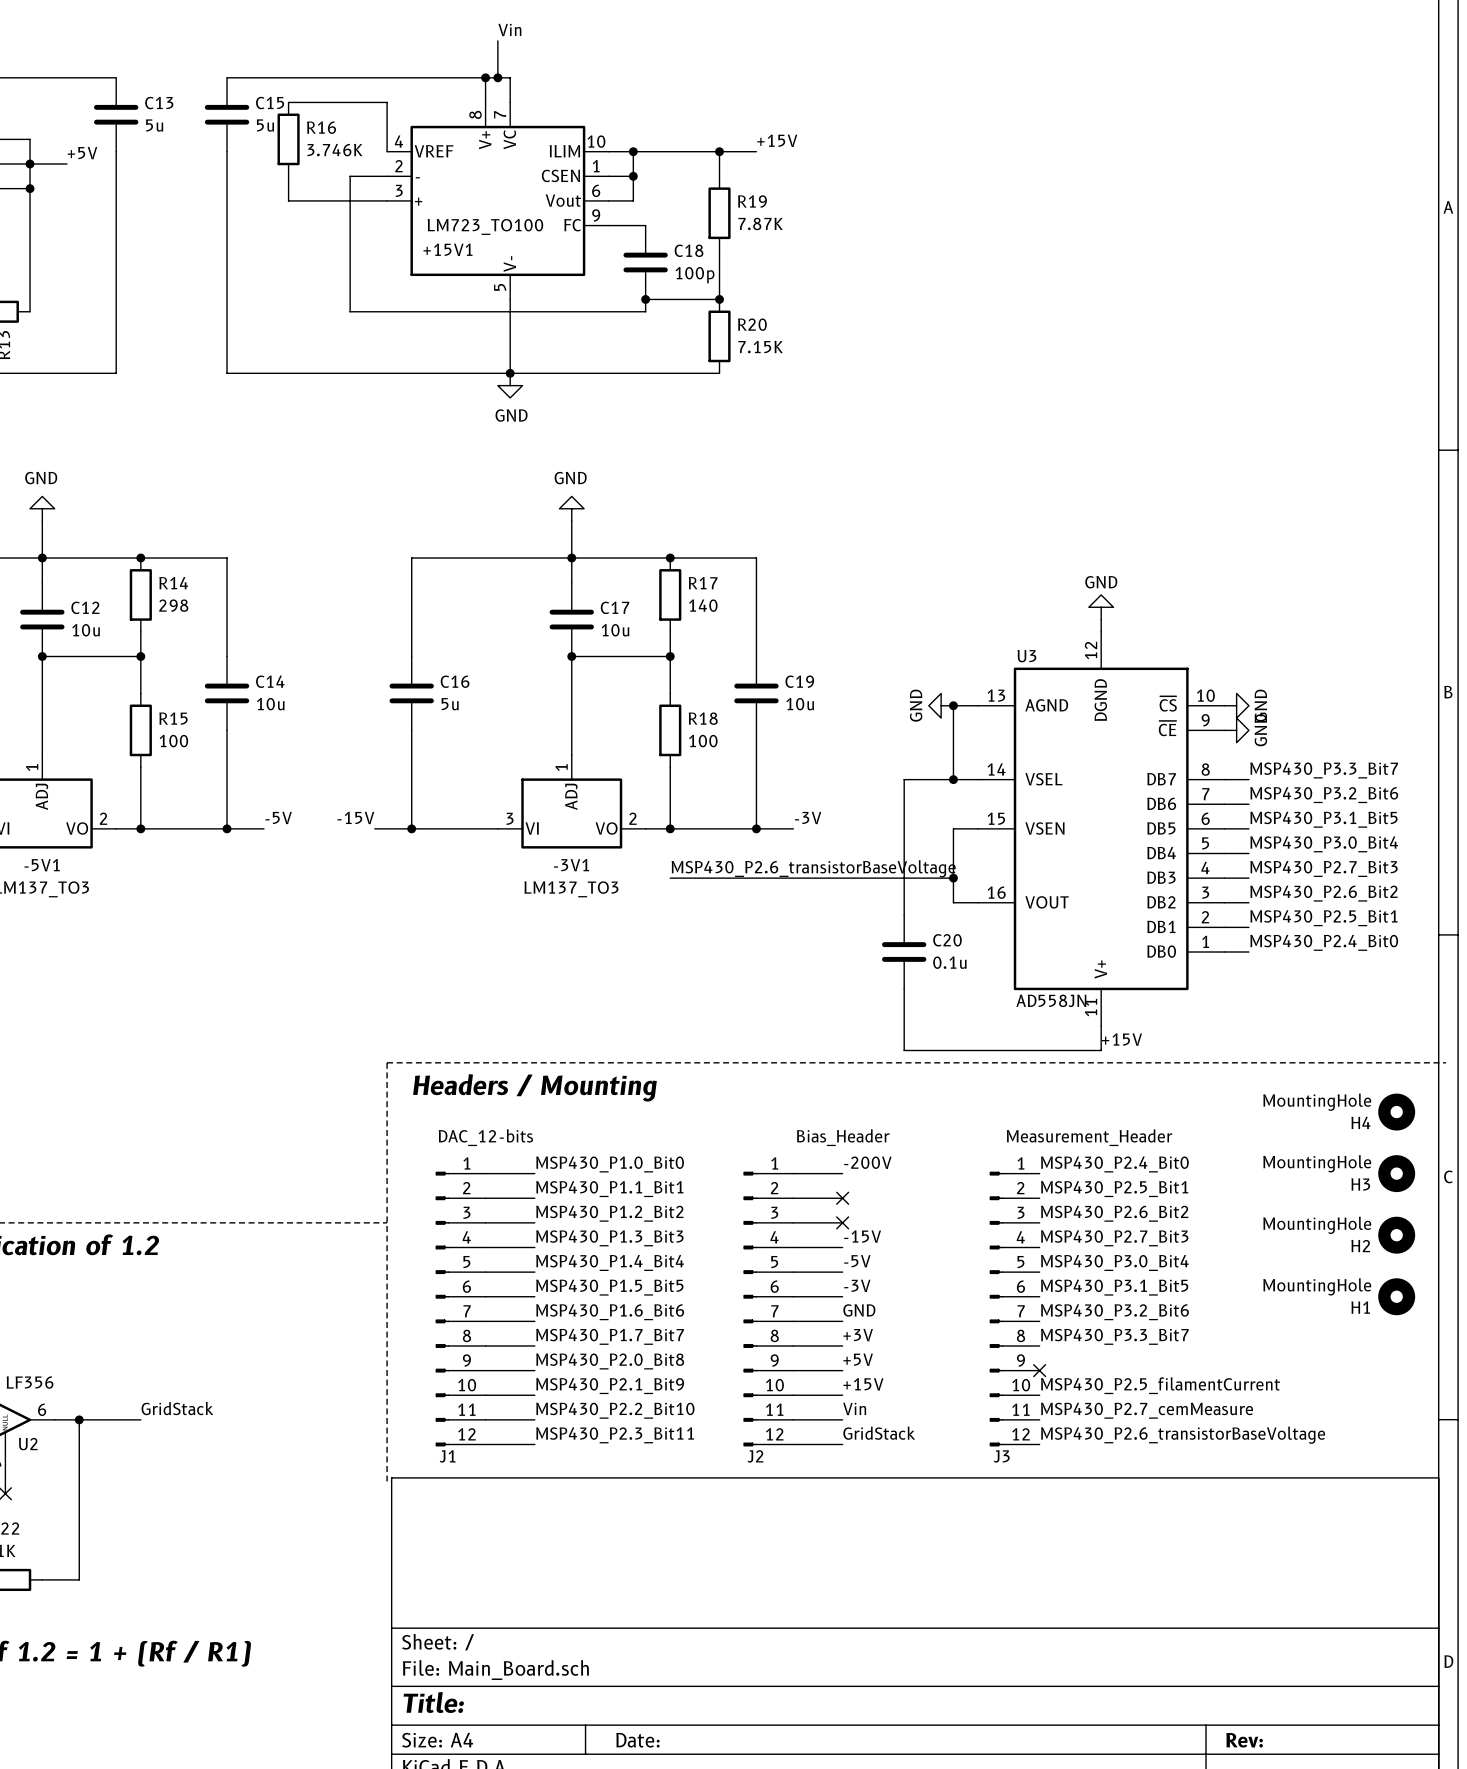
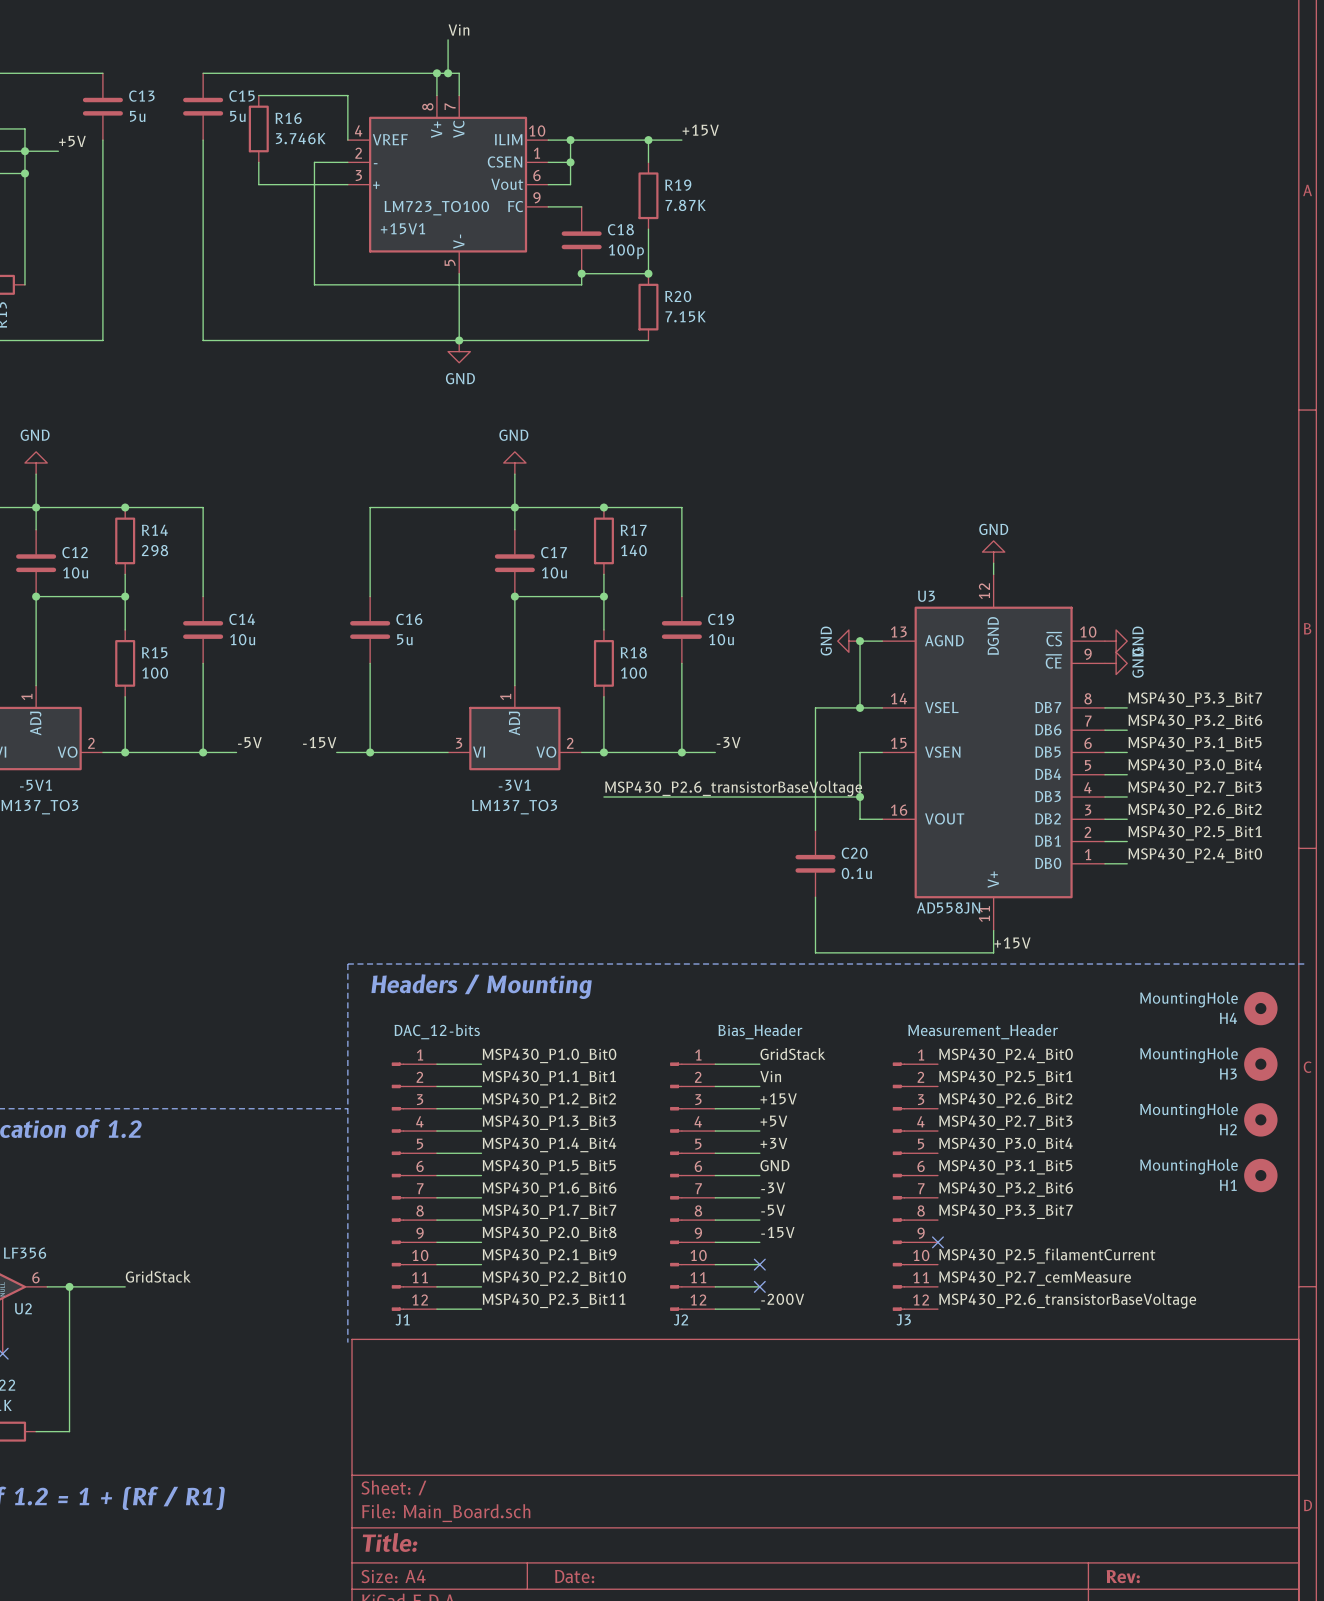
label: -200V (867, 1162) -> GridStack (792, 1053)
no-connect mark: (842, 1198) -> none
no-connect mark: (842, 1222) -> none
label: -15V (862, 1236) -> +5V (773, 1121)
label: -5V (857, 1261) -> +3V (773, 1143)
label: -3V (857, 1285) -> GND (774, 1165)
label: GND (859, 1310) -> -3V (773, 1187)
label: +3V (858, 1335) -> -5V (773, 1210)
label: +5V (858, 1359) -> -15V (777, 1232)
label position: +15V (863, 1384) -> +15V (778, 1098)
no-connect mark: none -> (759, 1264)
label position: Vin (854, 1408) -> Vin (770, 1076)
no-connect mark: none -> (759, 1286)
label: GridStack (879, 1433) -> -200V (782, 1299)

